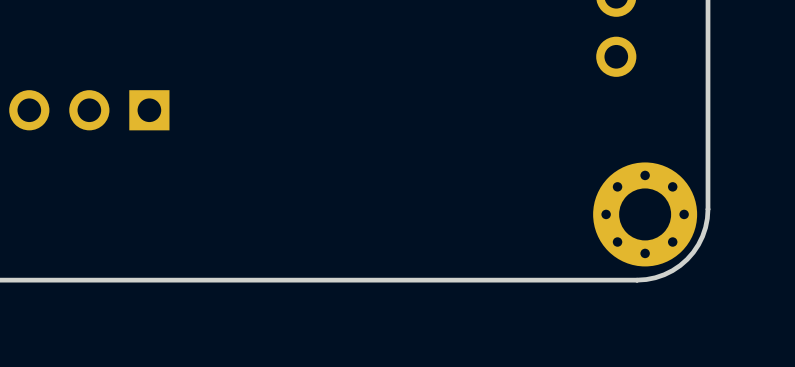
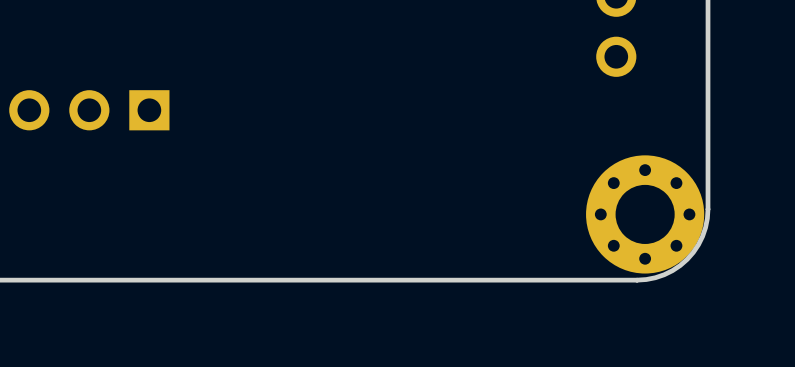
part footprint: [593, 162, 698, 267] -> [586, 155, 705, 274]

